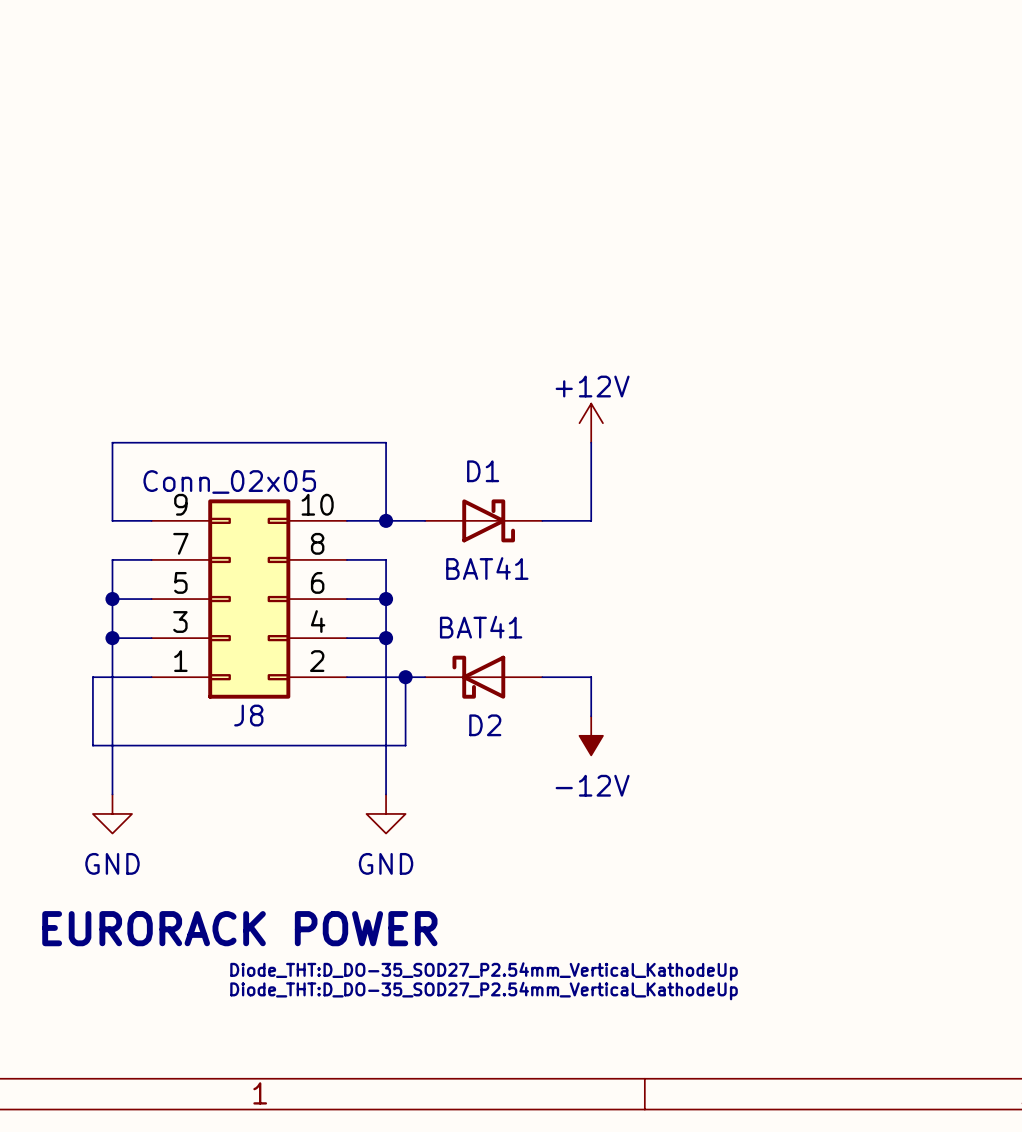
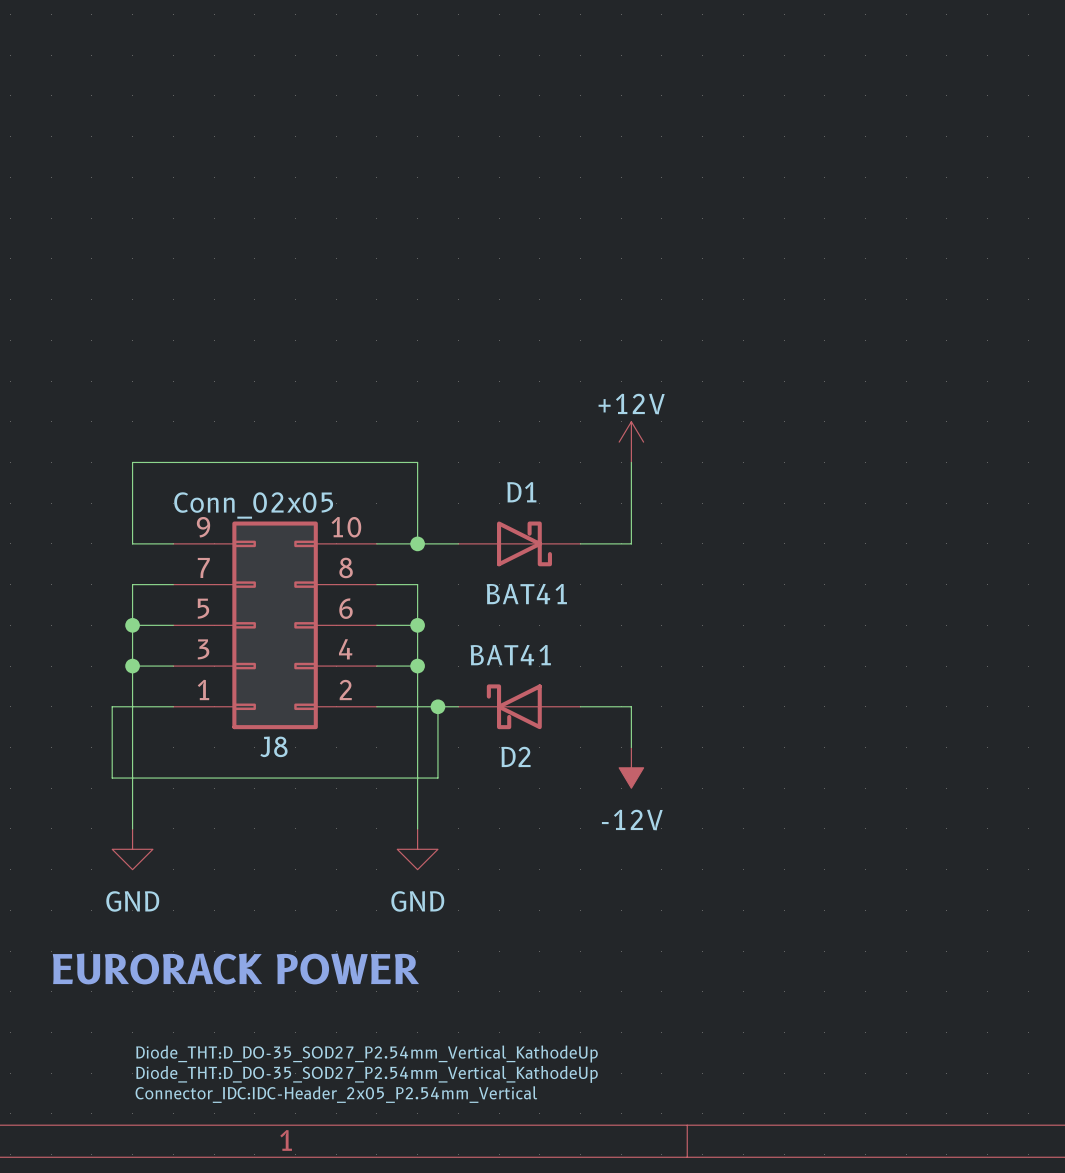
D1 text position: Diode_THT:D_DO-35_SOD27_P2.54mm_Vertical_KathodeUp (484, 971) -> Diode_THT:D_DO-35_SOD27_P2.54mm_Vertical_KathodeUp (366, 1054)
D2 text position: Diode_THT:D_DO-35_SOD27_P2.54mm_Vertical_KathodeUp (484, 991) -> Diode_THT:D_DO-35_SOD27_P2.54mm_Vertical_KathodeUp (366, 1074)
J8 text: none -> Connector_IDC:IDC-Header_2x05_P2.54mm_Vertical (336, 1094)

